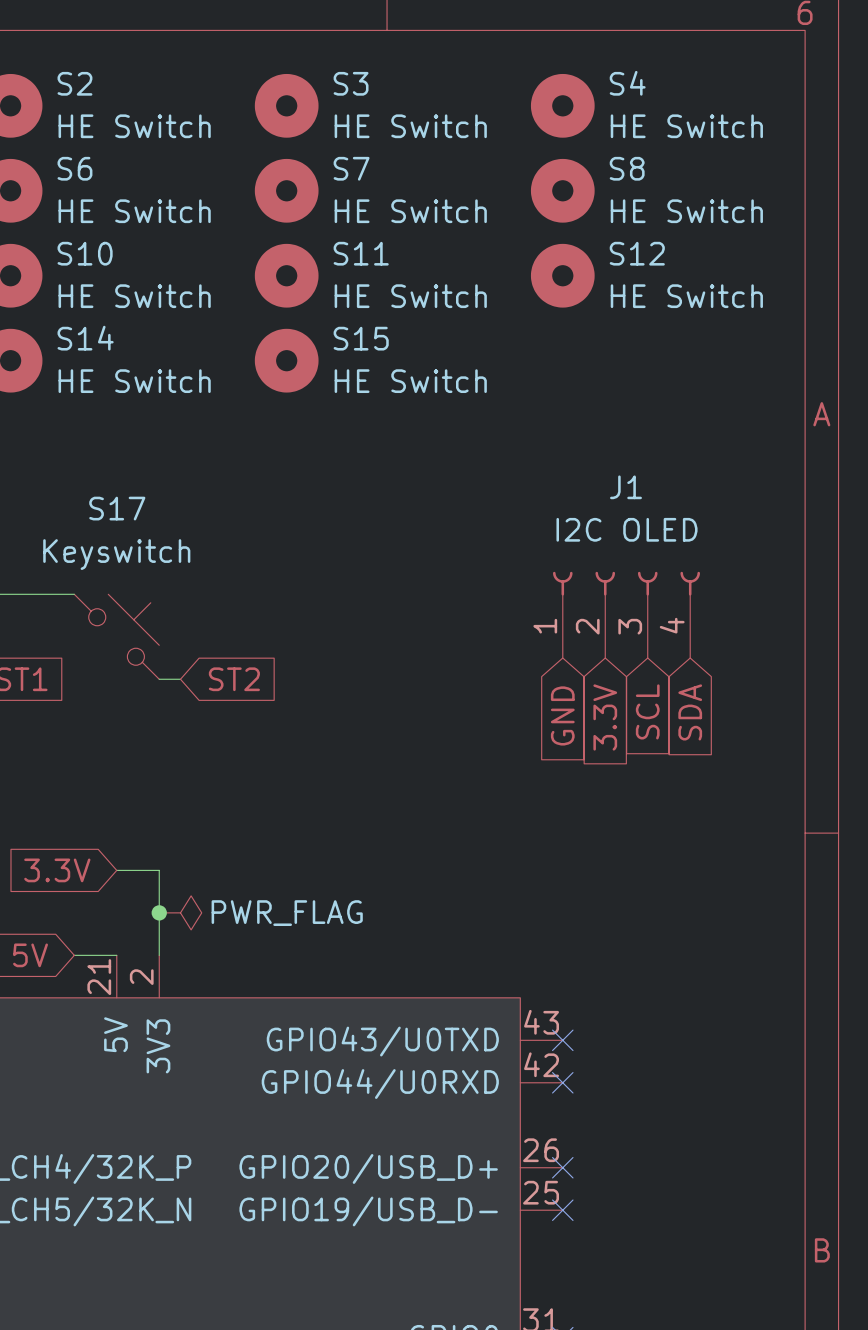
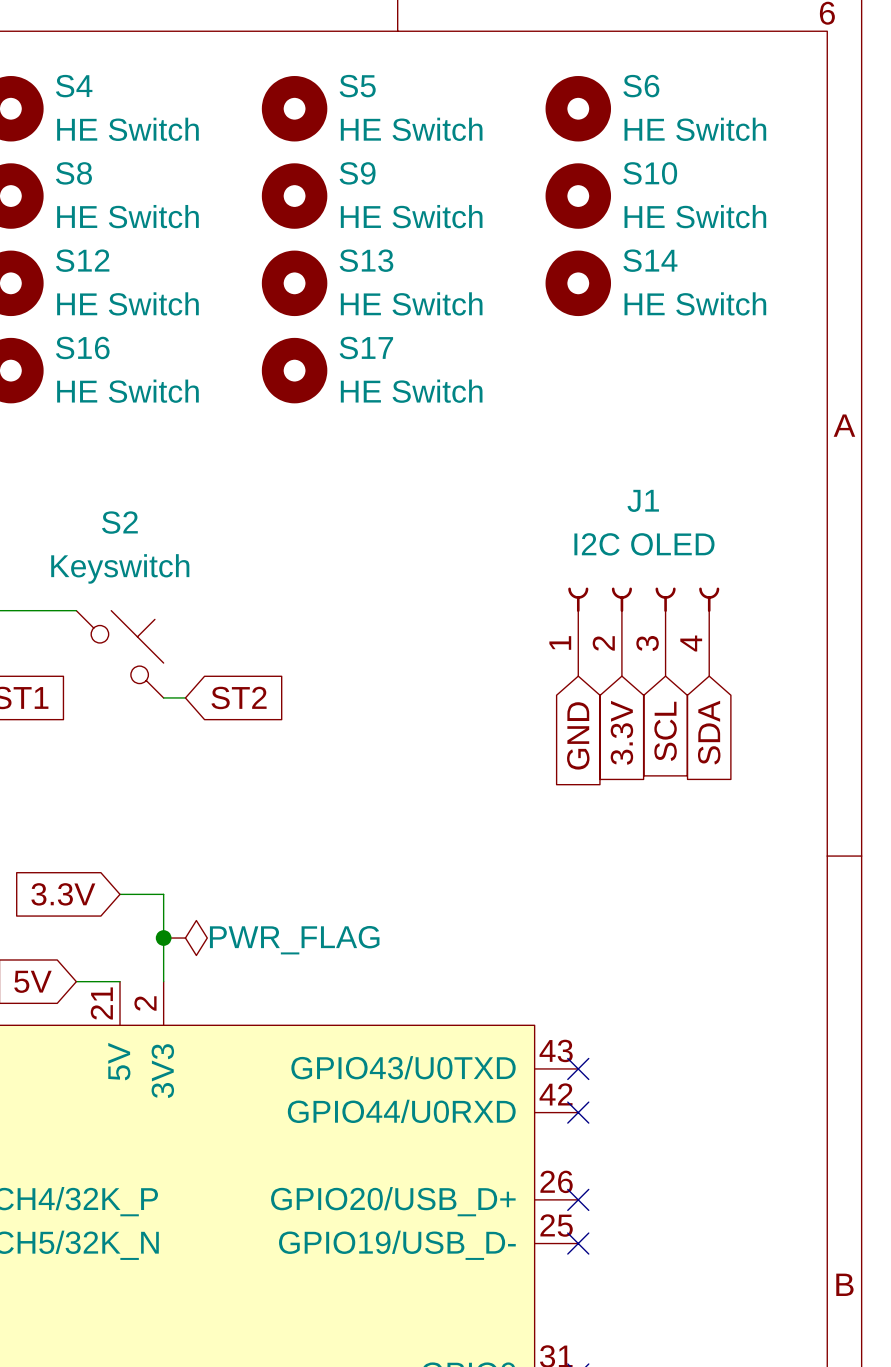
S2 name: S2 (74, 83) -> S4 (74, 86)
S3 name: S3 (351, 83) -> S5 (357, 86)
S4 name: S4 (627, 83) -> S6 (641, 86)
S6 name: S6 (74, 168) -> S8 (73, 173)
S7 name: S7 (351, 168) -> S9 (357, 173)
S8 name: S8 (627, 168) -> S10 (650, 173)
S10 name: S10 (85, 253) -> S12 (82, 260)
S11 name: S11 (361, 253) -> S13 (366, 260)
S12 name: S12 (637, 253) -> S14 (650, 260)
S14 name: S14 (85, 338) -> S16 (82, 347)
S15 name: S15 (361, 338) -> S17 (366, 347)
S17 name: S17 (117, 508) -> S2 (119, 522)

